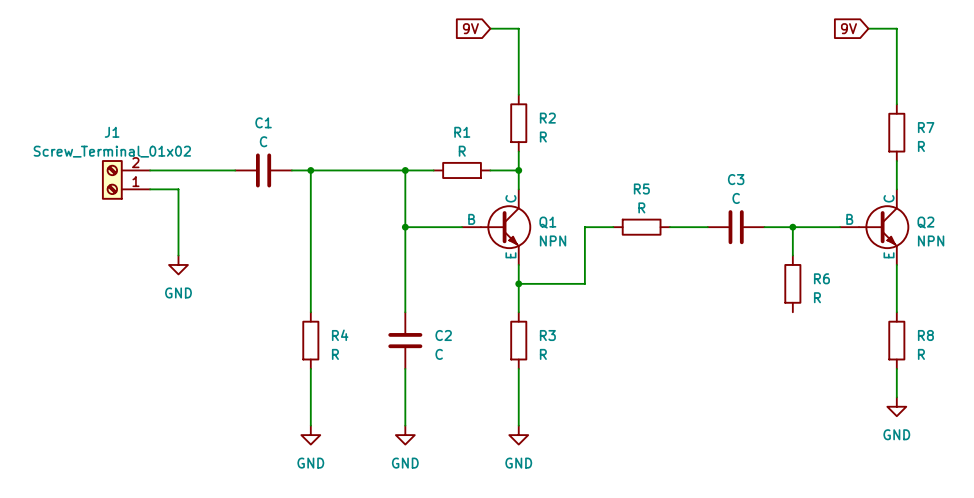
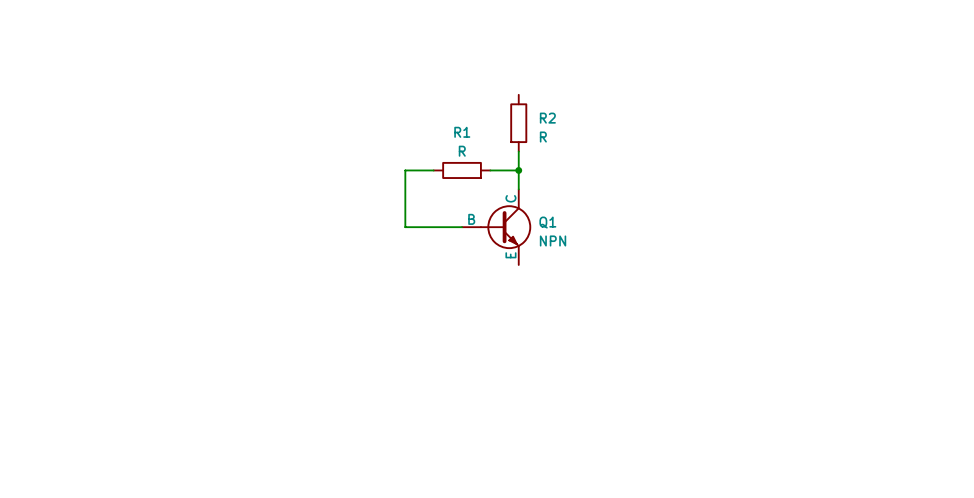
global label: 9V (470, 28) -> none
wire: (490, 28) (518, 28) (518, 94) -> none
global label: 9V (848, 28) -> none
wire: (868, 28) (896, 28) (896, 104) -> none
R7: R (896, 132) -> none
wire: (896, 161) (896, 189) -> none
wire: (150, 170) (235, 170) -> none
C1: C (263, 170) -> none
wire: (291, 170) (405, 170) -> none
wire: (310, 170) (310, 312) -> none
junction: (310, 170) -> none
junction: (405, 170) -> none
J1: Screw_Terminal_01x02 (126, 179) -> none
wire: (150, 189) (178, 189) (178, 255) -> none
wire: (405, 227) (405, 312) -> none
junction: (405, 227) -> none
wire: (613, 227) (584, 227) (584, 283) (518, 283) -> none
R5: R (641, 227) -> none
wire: (669, 227) (707, 227) -> none
C3: C (736, 227) -> none
wire: (764, 227) (840, 227) -> none
wire: (792, 227) (792, 255) -> none
junction: (792, 227) -> none
Q2: NPN (874, 227) -> none
power symbol: GND (178, 264) -> none
wire: (518, 264) (518, 312) -> none
wire: (896, 264) (896, 312) -> none
junction: (518, 283) -> none
R6: R (792, 283) -> none
R4: R (310, 340) -> none
C2: C (405, 340) -> none
R3: R (518, 340) -> none
R8: R (896, 340) -> none
wire: (310, 368) (310, 425) -> none
wire: (405, 368) (405, 425) -> none
wire: (518, 368) (518, 425) -> none
wire: (896, 368) (896, 397) -> none
power symbol: GND (896, 406) -> none
power symbol: GND (310, 435) -> none
power symbol: GND (405, 435) -> none
power symbol: GND (518, 435) -> none

